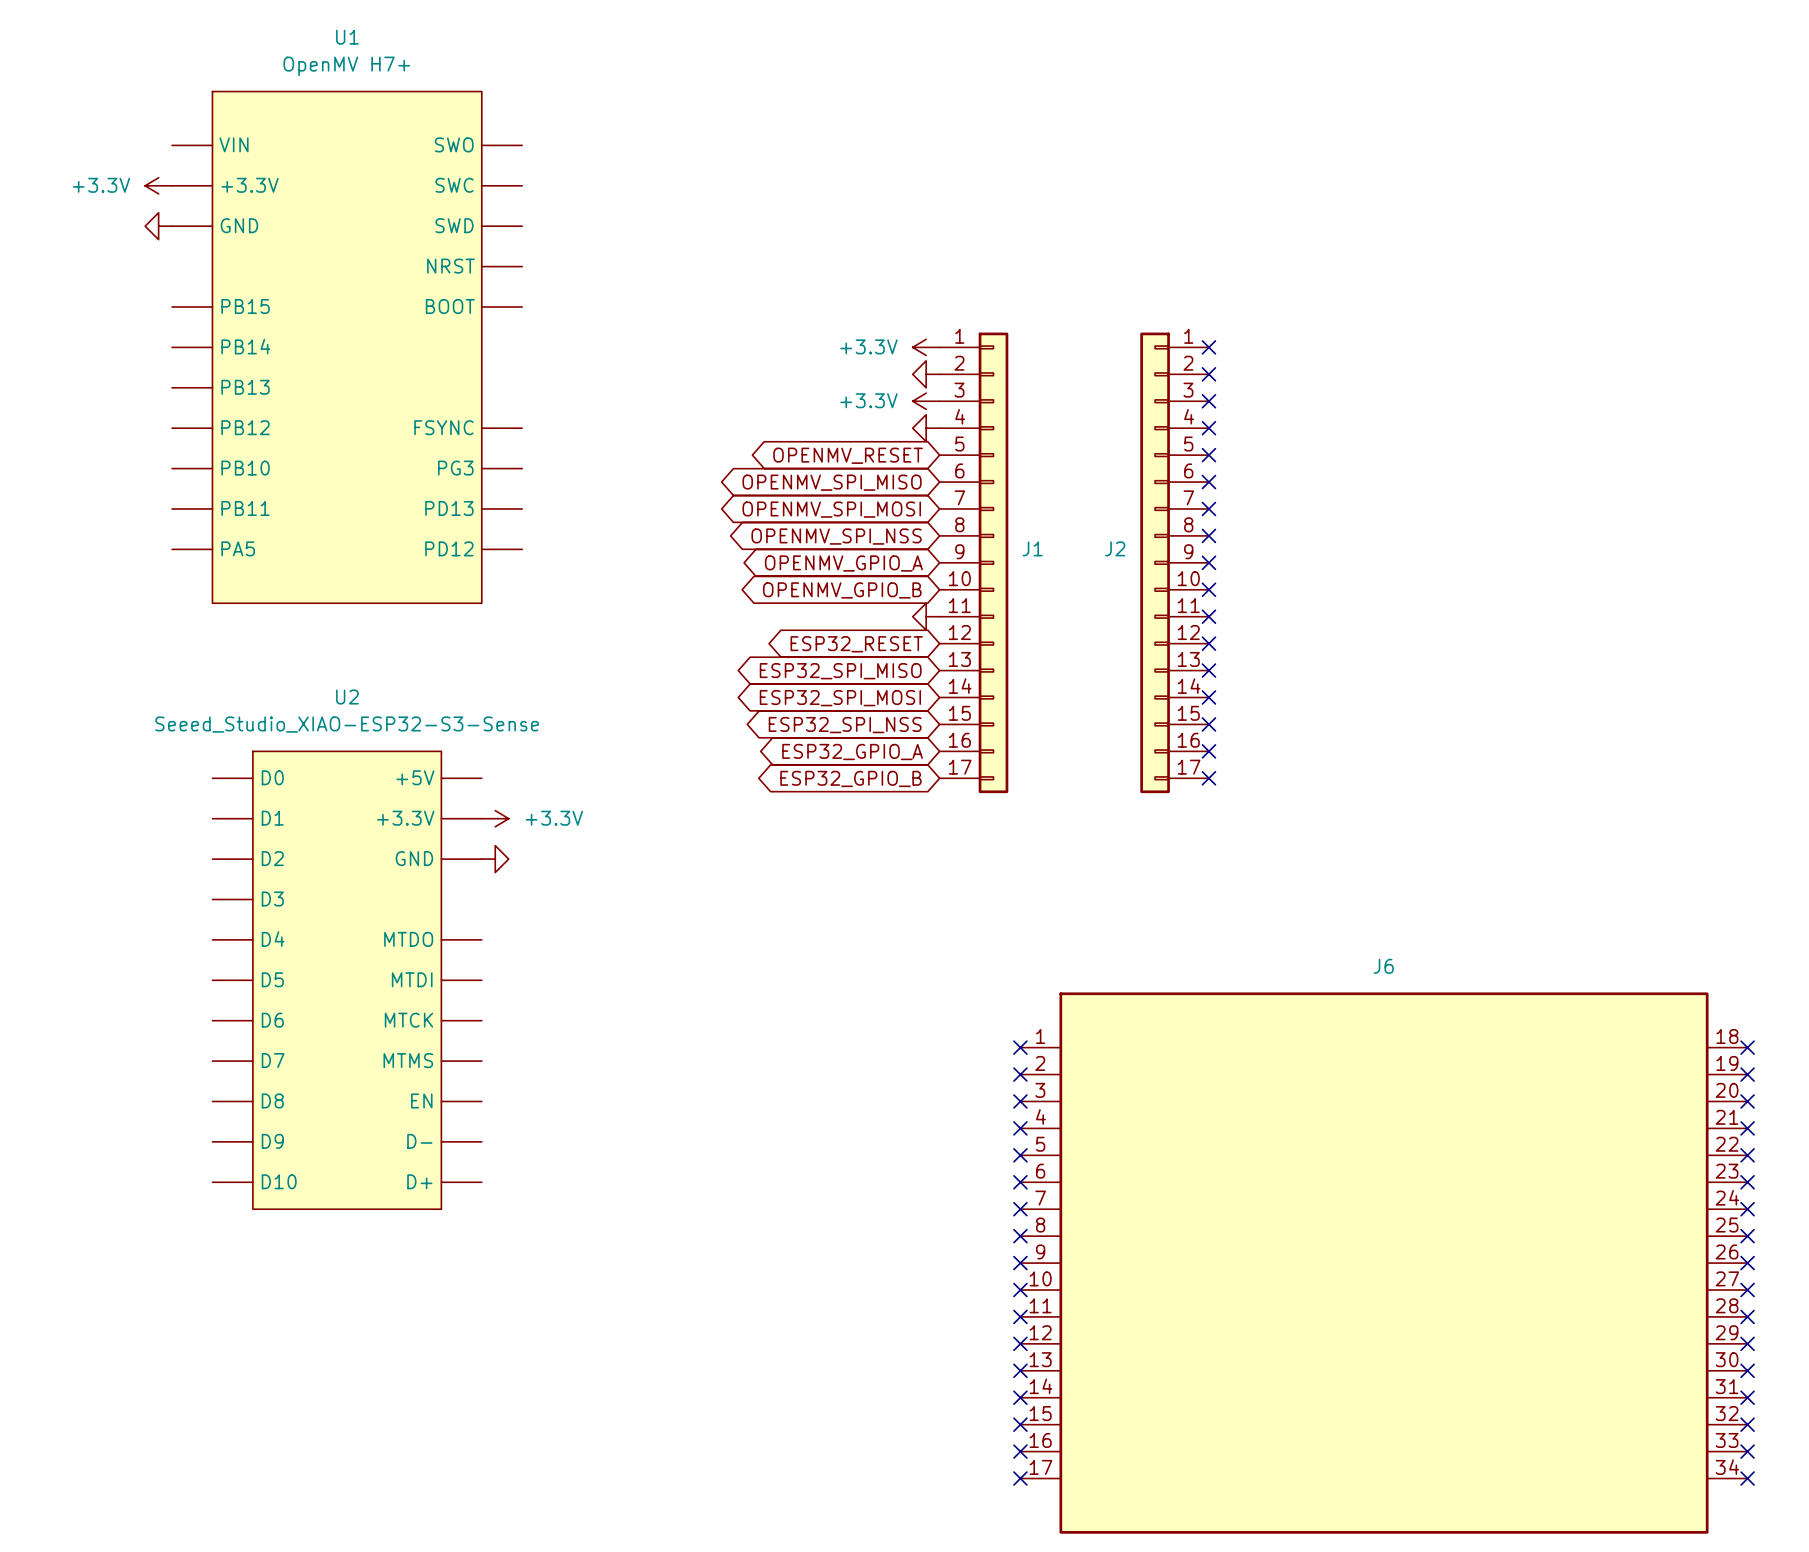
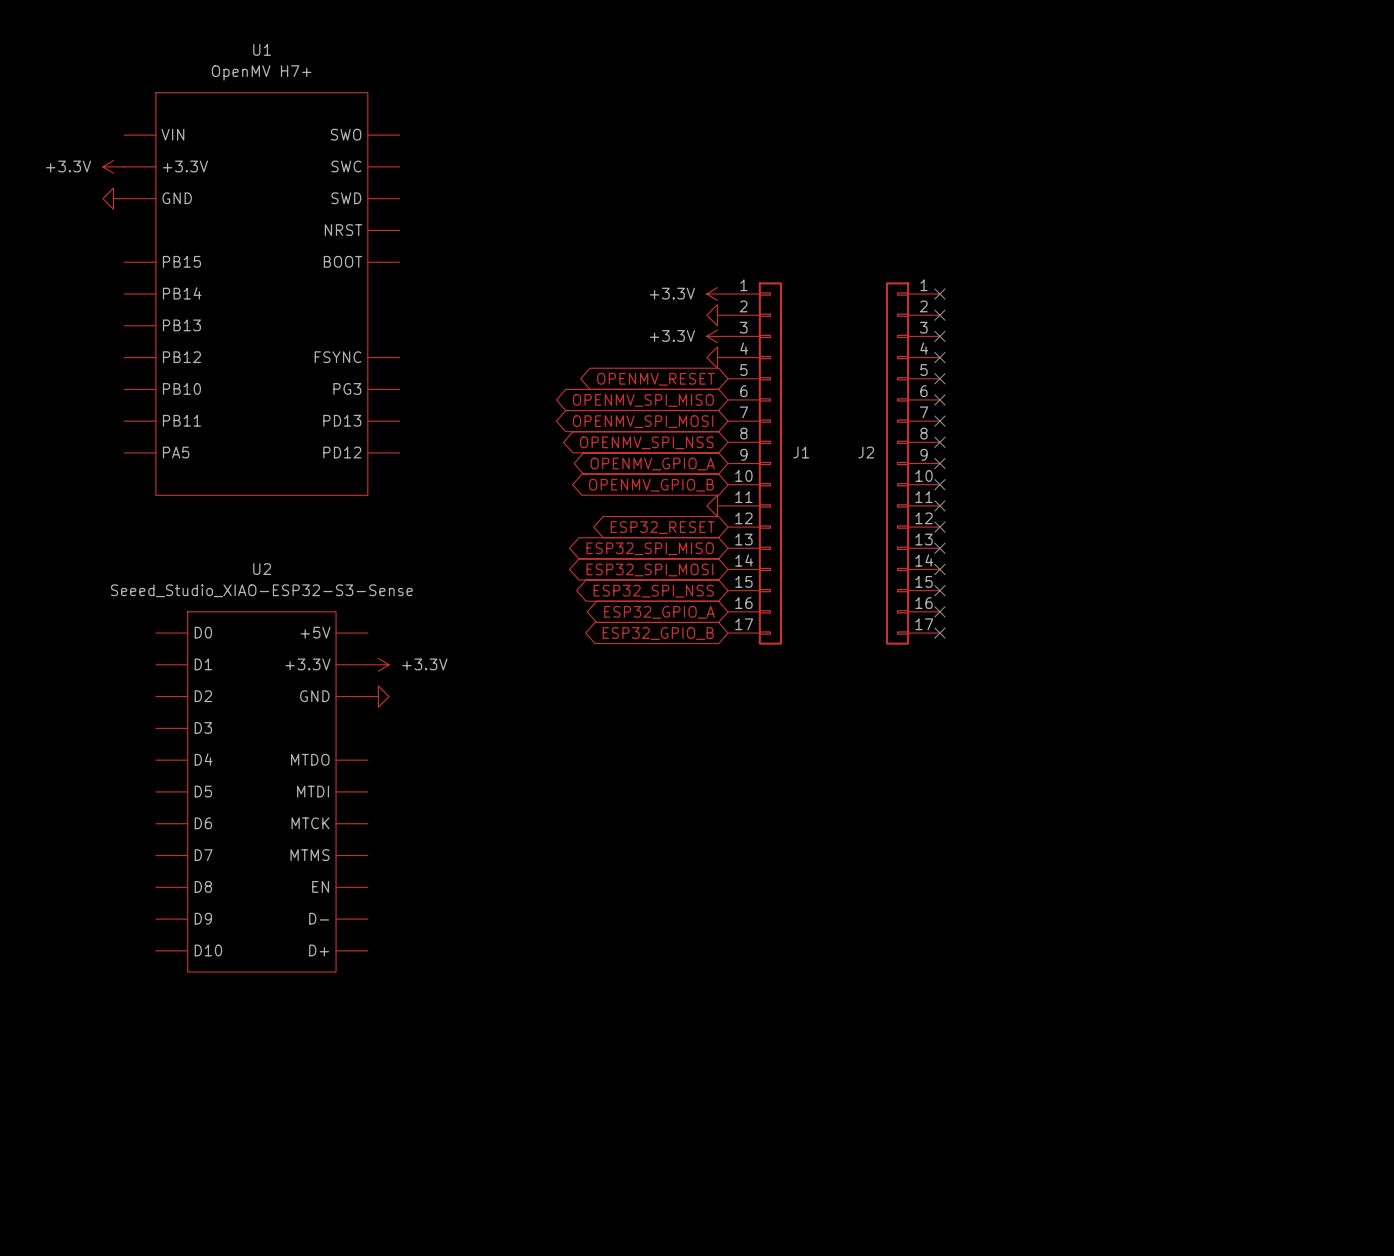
no-connect mark: (1020, 1047) -> none
no-connect mark: (1747, 1047) -> none
no-connect mark: (1020, 1074) -> none
no-connect mark: (1747, 1074) -> none
no-connect mark: (1020, 1101) -> none
no-connect mark: (1747, 1101) -> none
no-connect mark: (1020, 1128) -> none
no-connect mark: (1747, 1128) -> none
no-connect mark: (1020, 1155) -> none
no-connect mark: (1747, 1155) -> none
no-connect mark: (1020, 1182) -> none
no-connect mark: (1747, 1182) -> none
no-connect mark: (1020, 1209) -> none
no-connect mark: (1747, 1209) -> none
no-connect mark: (1020, 1236) -> none
no-connect mark: (1747, 1236) -> none
no-connect mark: (1020, 1263) -> none
J6: (1384, 1263) -> none
no-connect mark: (1747, 1263) -> none
no-connect mark: (1020, 1290) -> none
no-connect mark: (1747, 1290) -> none
no-connect mark: (1020, 1316) -> none
no-connect mark: (1747, 1316) -> none
no-connect mark: (1020, 1343) -> none
no-connect mark: (1747, 1343) -> none
no-connect mark: (1020, 1370) -> none
no-connect mark: (1747, 1370) -> none
no-connect mark: (1020, 1397) -> none
no-connect mark: (1747, 1397) -> none
no-connect mark: (1020, 1424) -> none
no-connect mark: (1747, 1424) -> none
no-connect mark: (1020, 1451) -> none
no-connect mark: (1747, 1451) -> none
no-connect mark: (1020, 1478) -> none
no-connect mark: (1747, 1478) -> none

